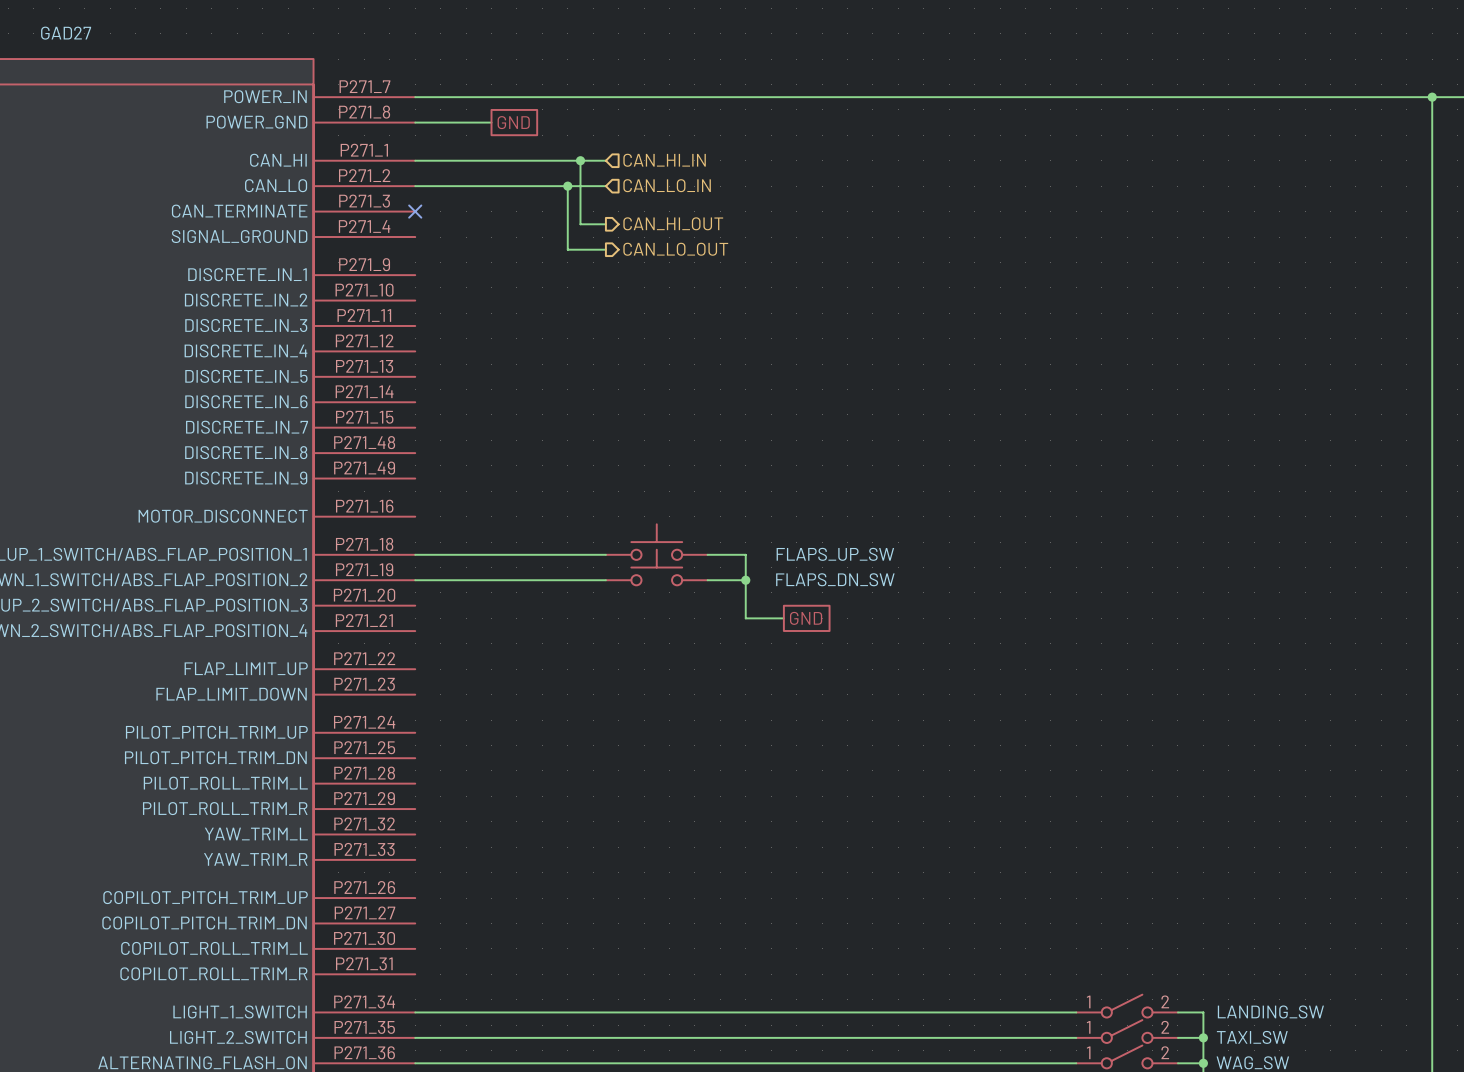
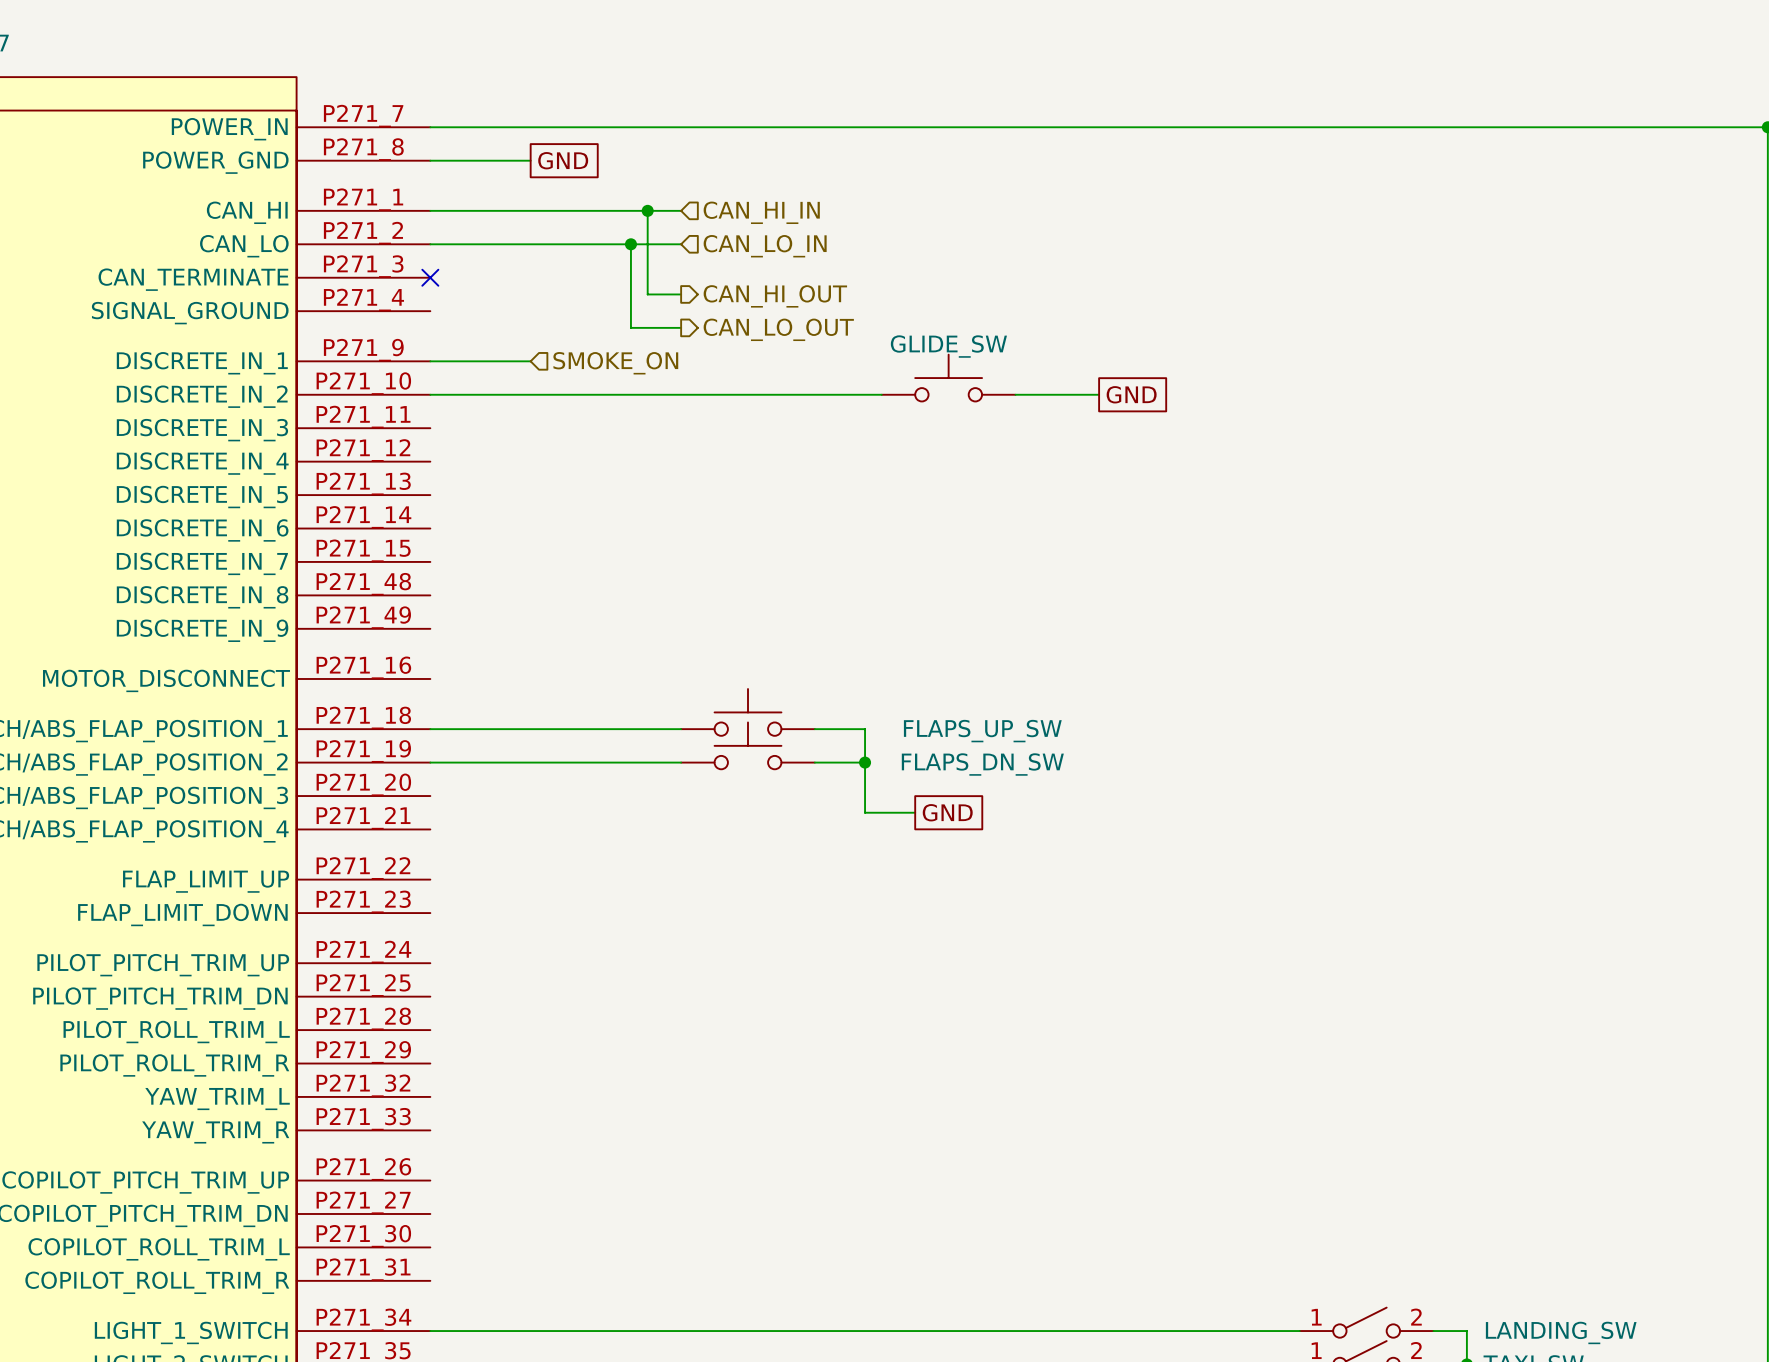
hierarchical label: none -> SMOKE_ON (615, 363)
wire: none -> (430, 361) (530, 361)
GLIDE_SW: none -> (948, 378)
wire: none -> (430, 394) (881, 394)
wire: none -> (1015, 394) (1099, 394)
global label: none -> GND (1131, 394)

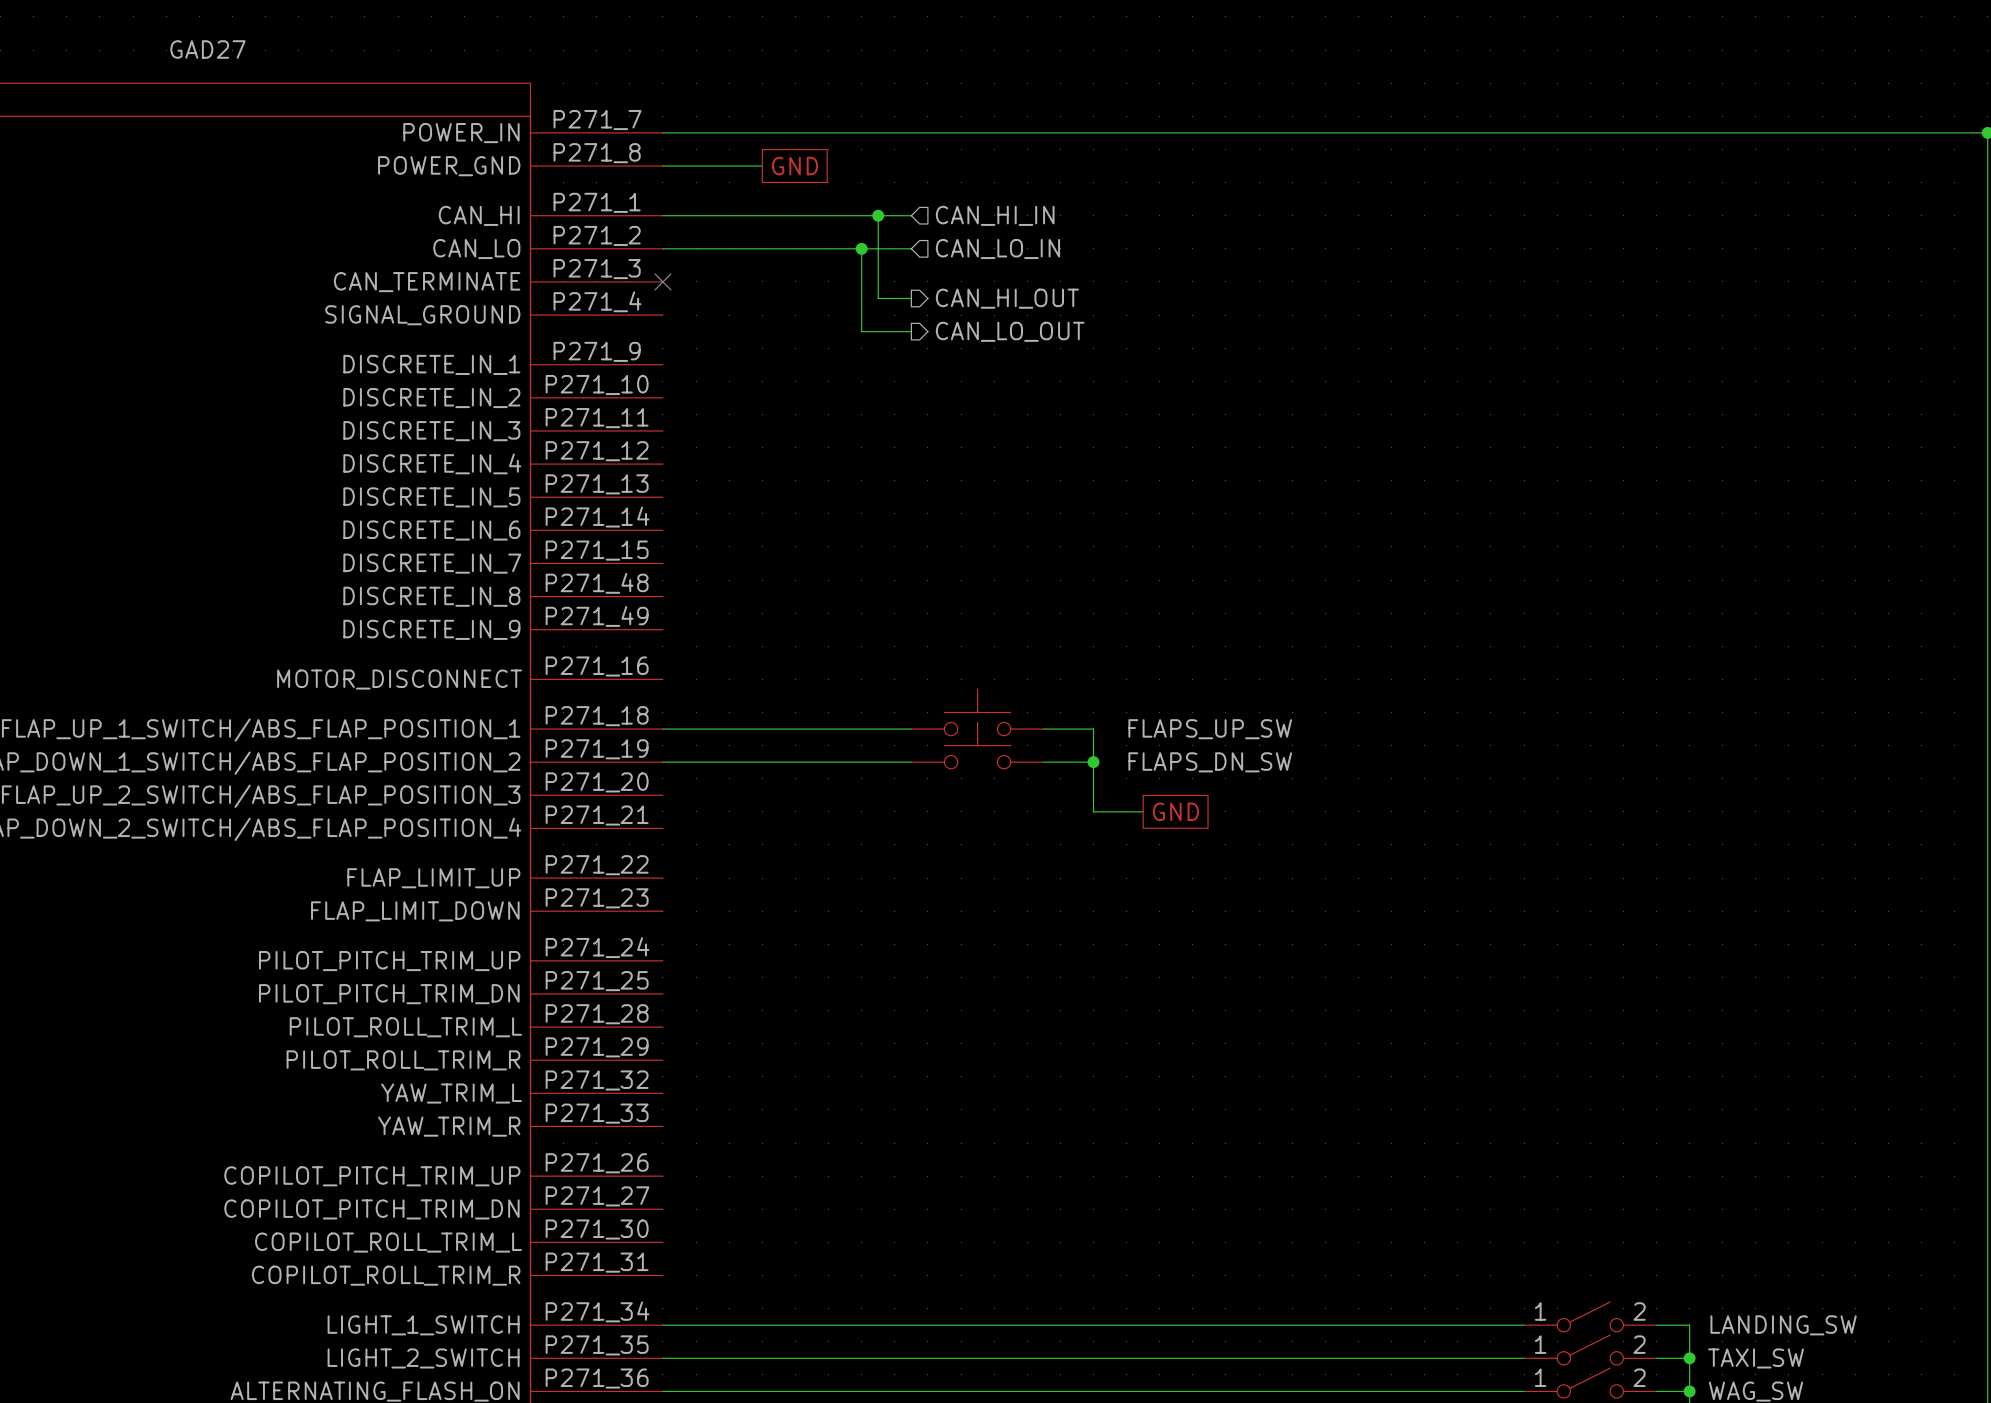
wire: (430, 361) (530, 361) -> none
hierarchical label: SMOKE_ON (615, 363) -> none
GLIDE_SW: (948, 378) -> none
wire: (430, 394) (881, 394) -> none
wire: (1015, 394) (1099, 394) -> none
global label: GND (1131, 394) -> none

